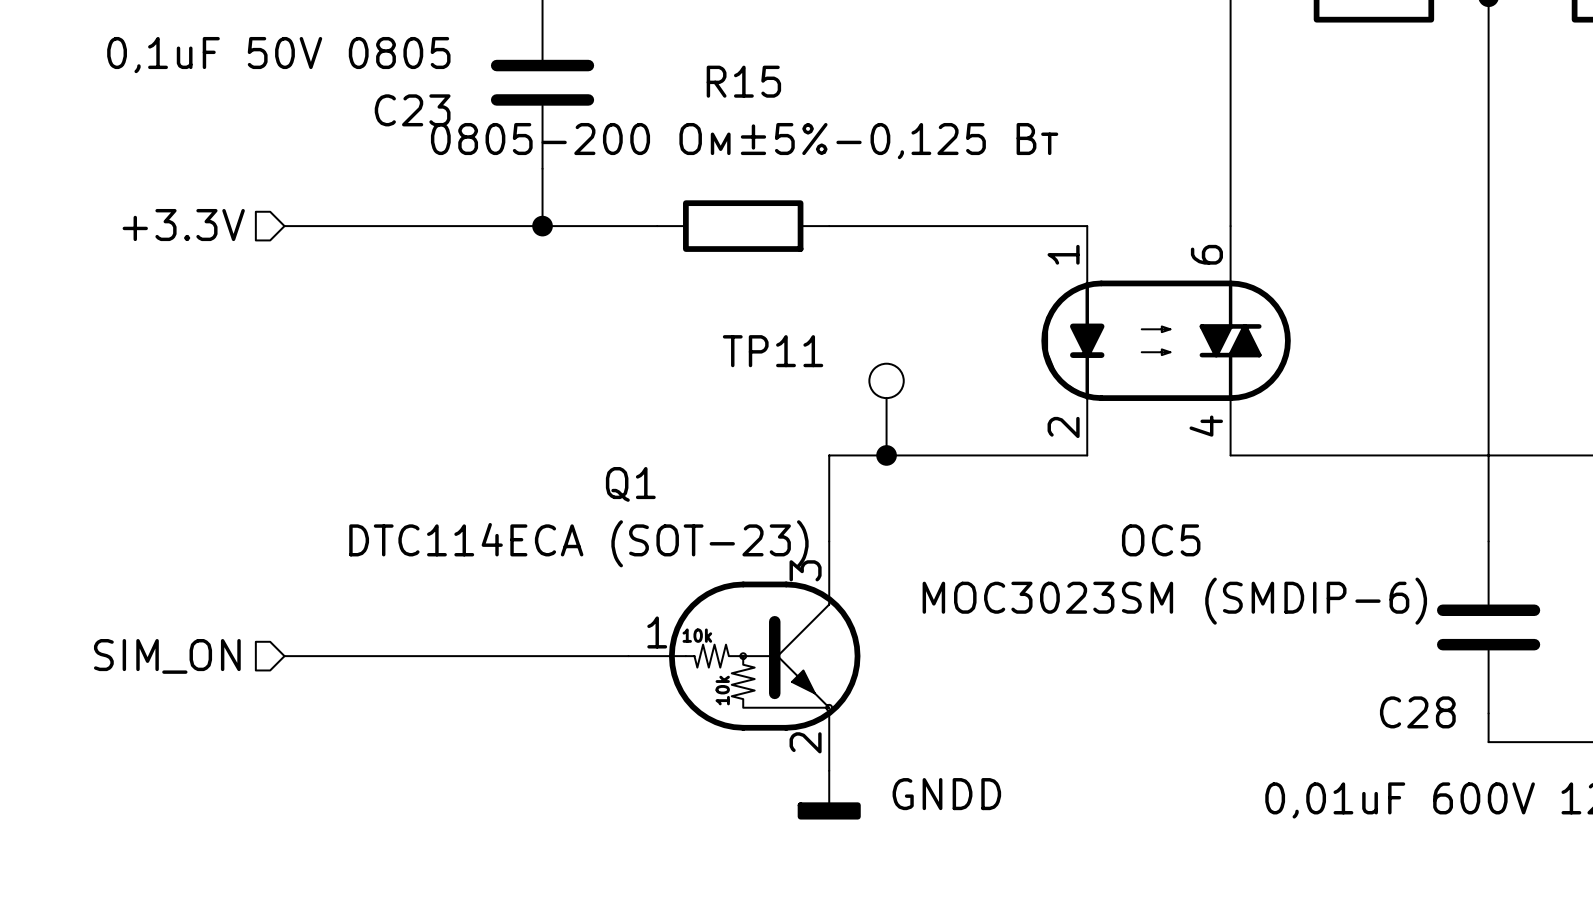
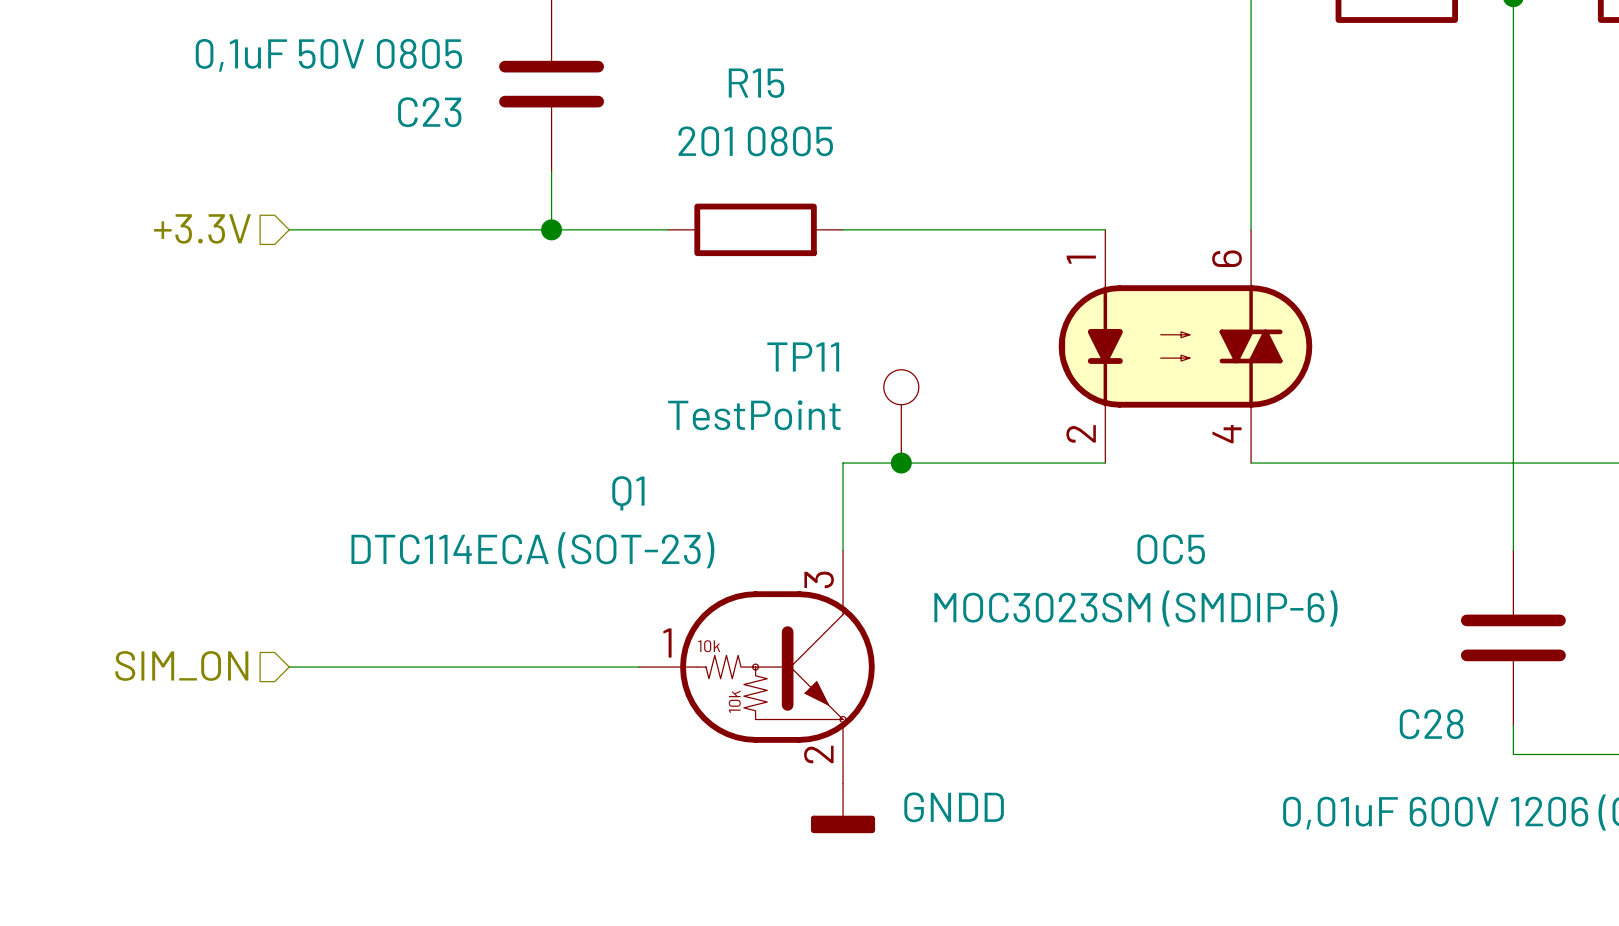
R15 value: 0805-200 Ом±5%-0,125 Вт (744, 141) -> 201 0805 (755, 141)
TP11 value: none -> TestPoint (754, 415)

